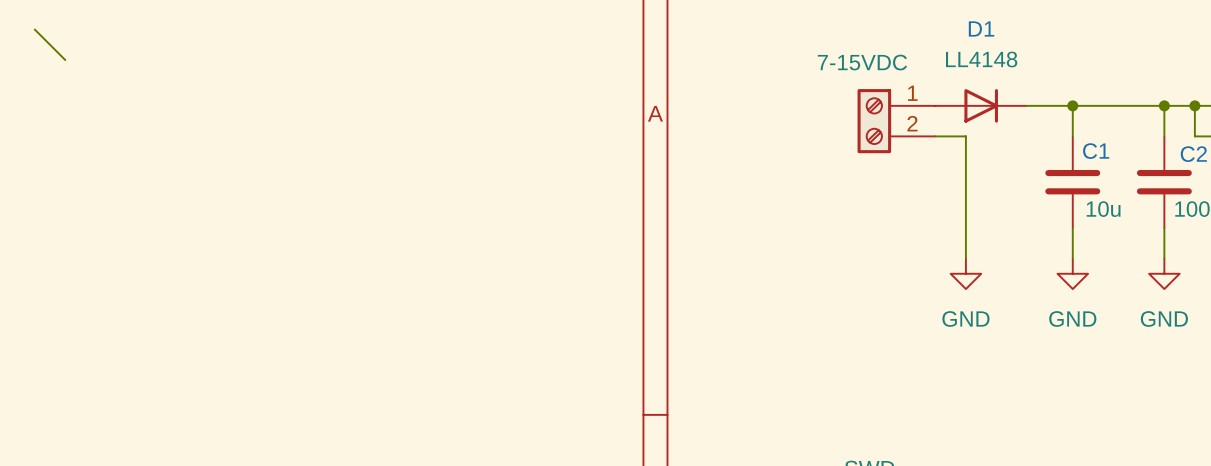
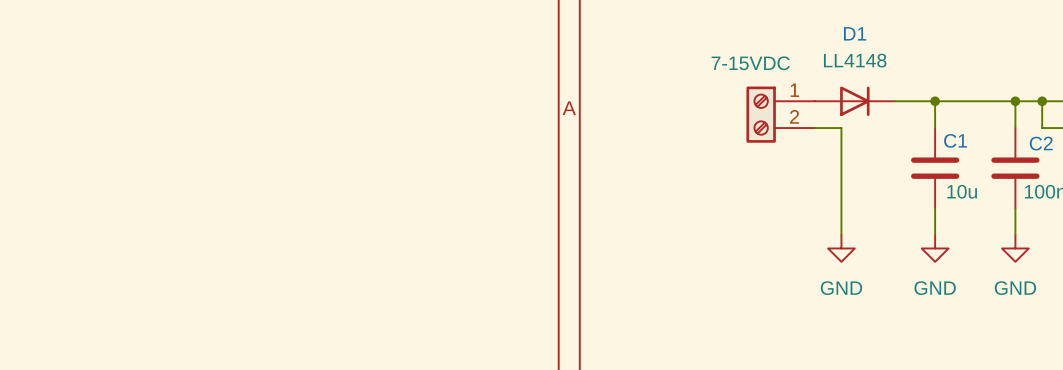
wire: (34, 29) (65, 60) -> none

